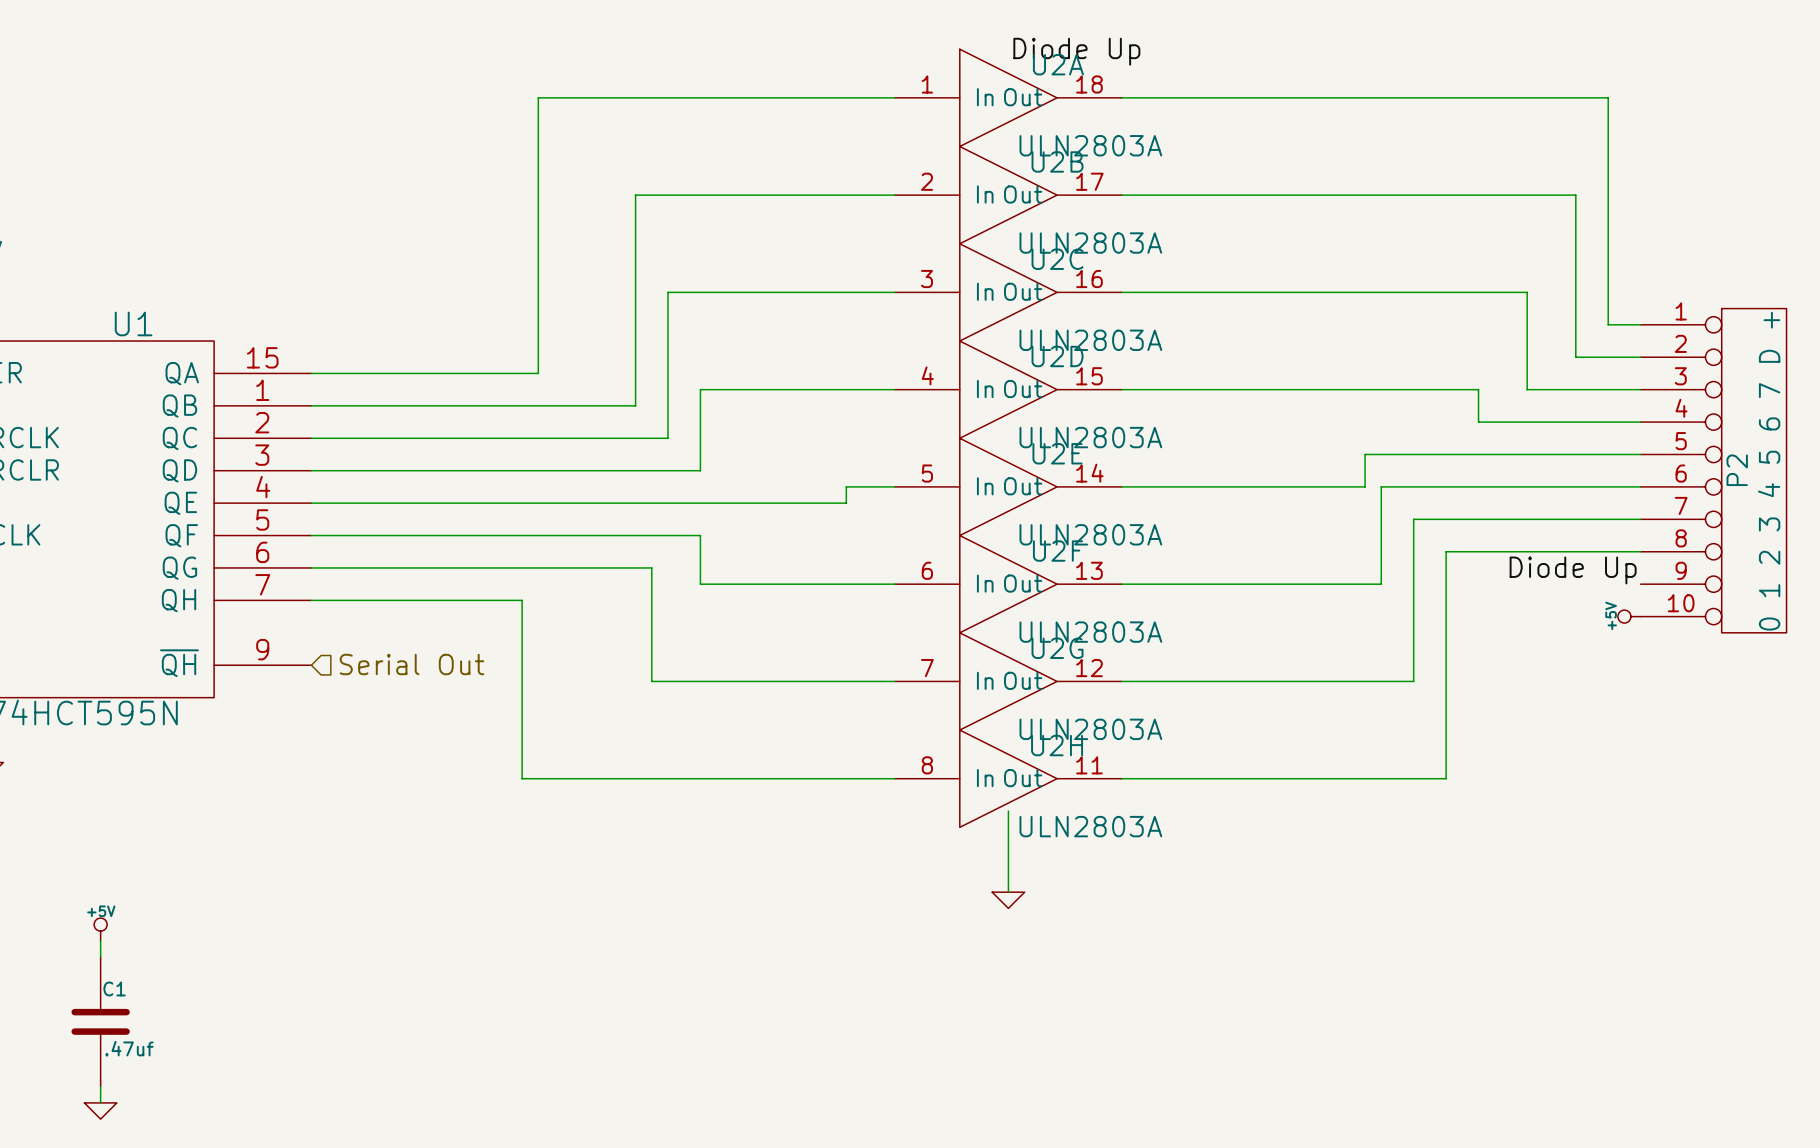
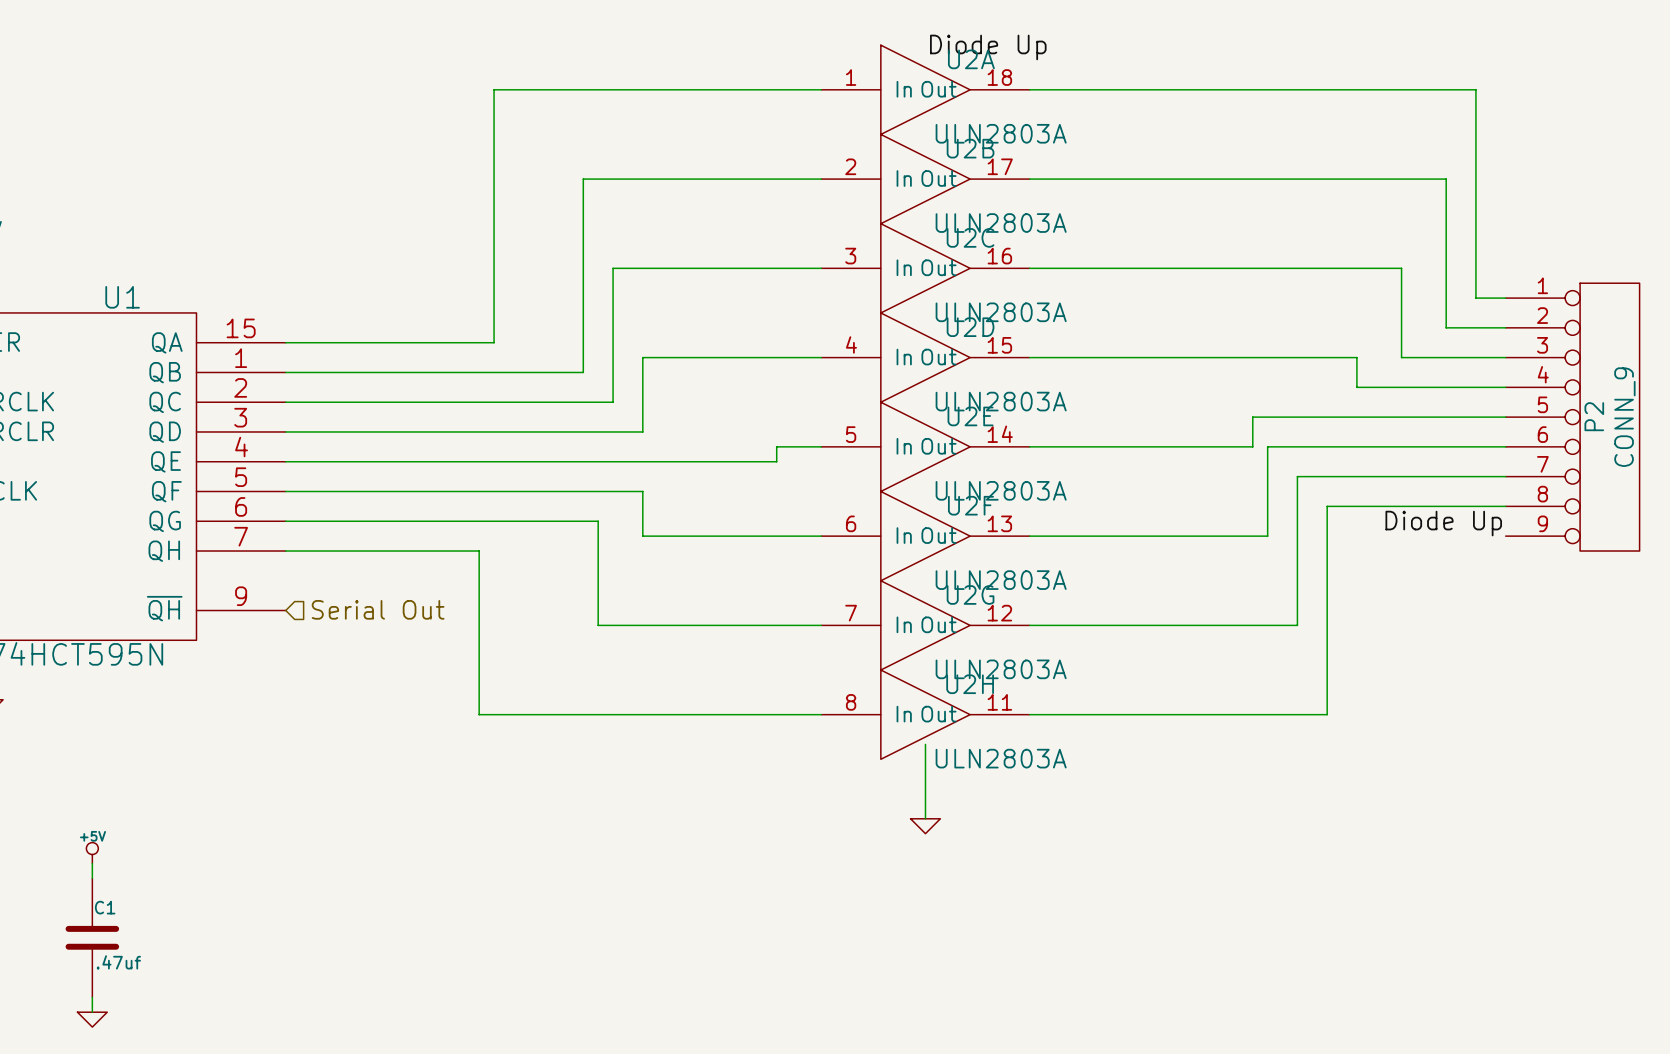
P2 symbol: [1640, 308, 1787, 633] -> [1505, 283, 1640, 552]
P2 value: 0 1 2 3 4 5 6 7 D + (1769, 471) -> CONN_9 (1624, 417)
power symbol: +5V (1629, 616) -> none

